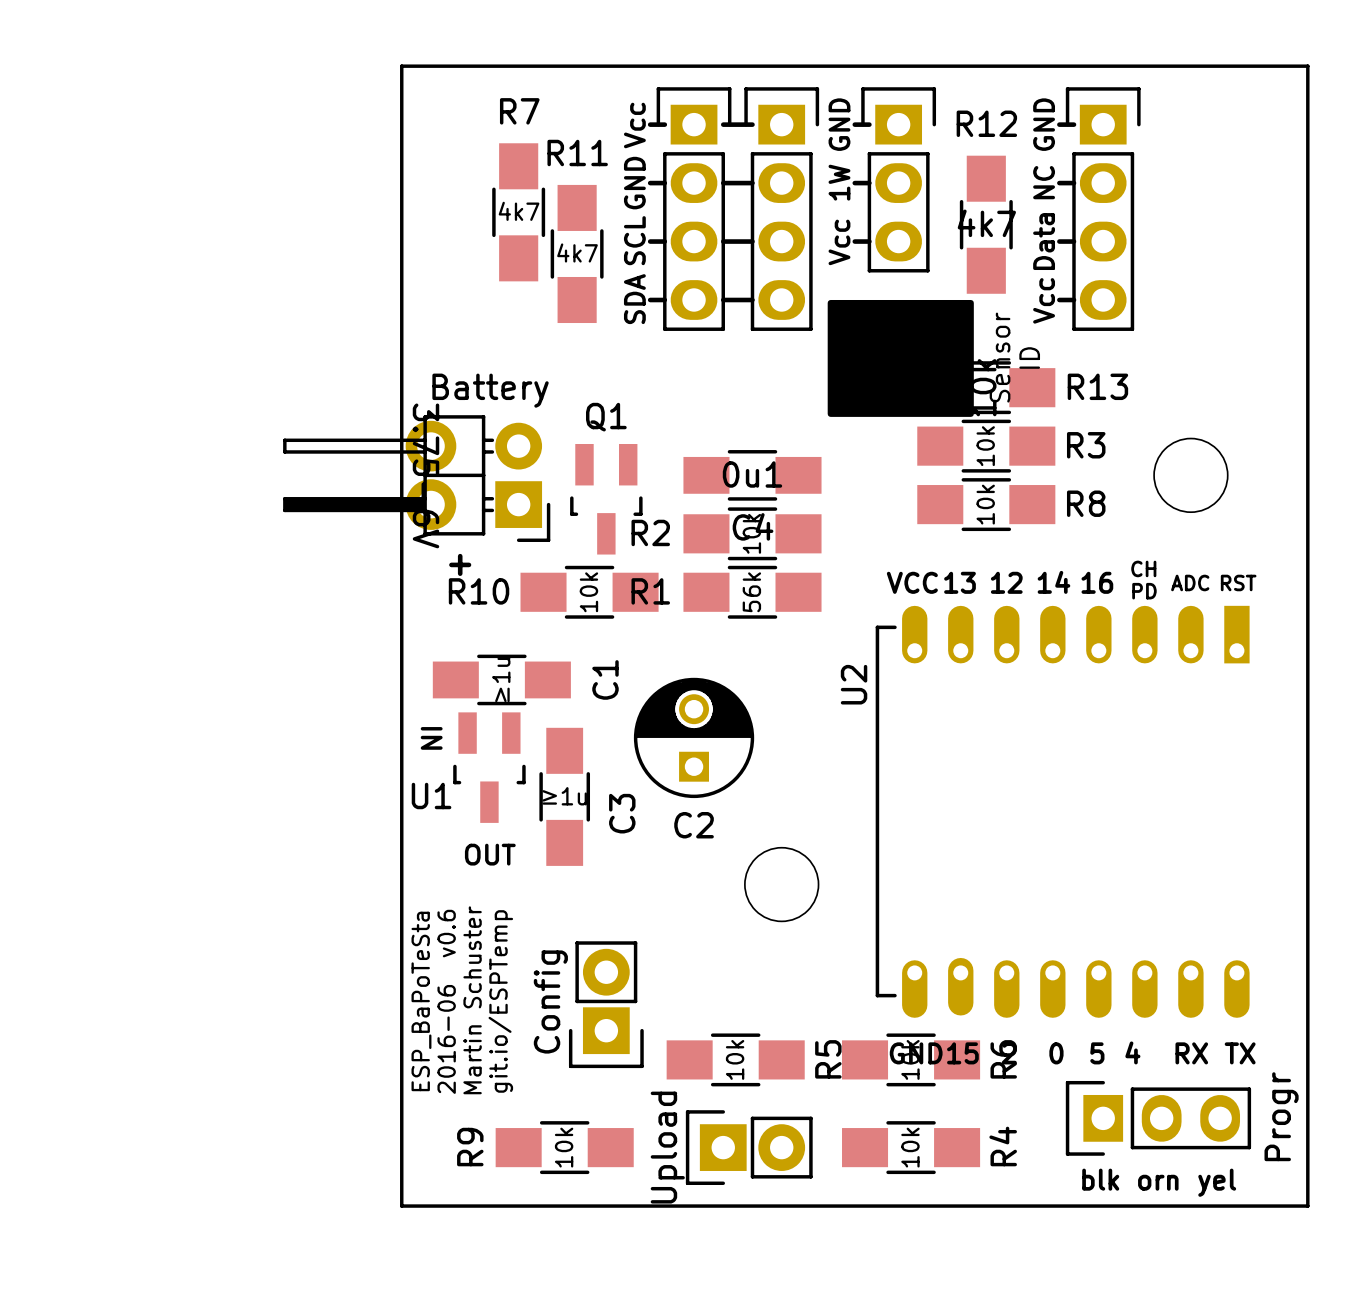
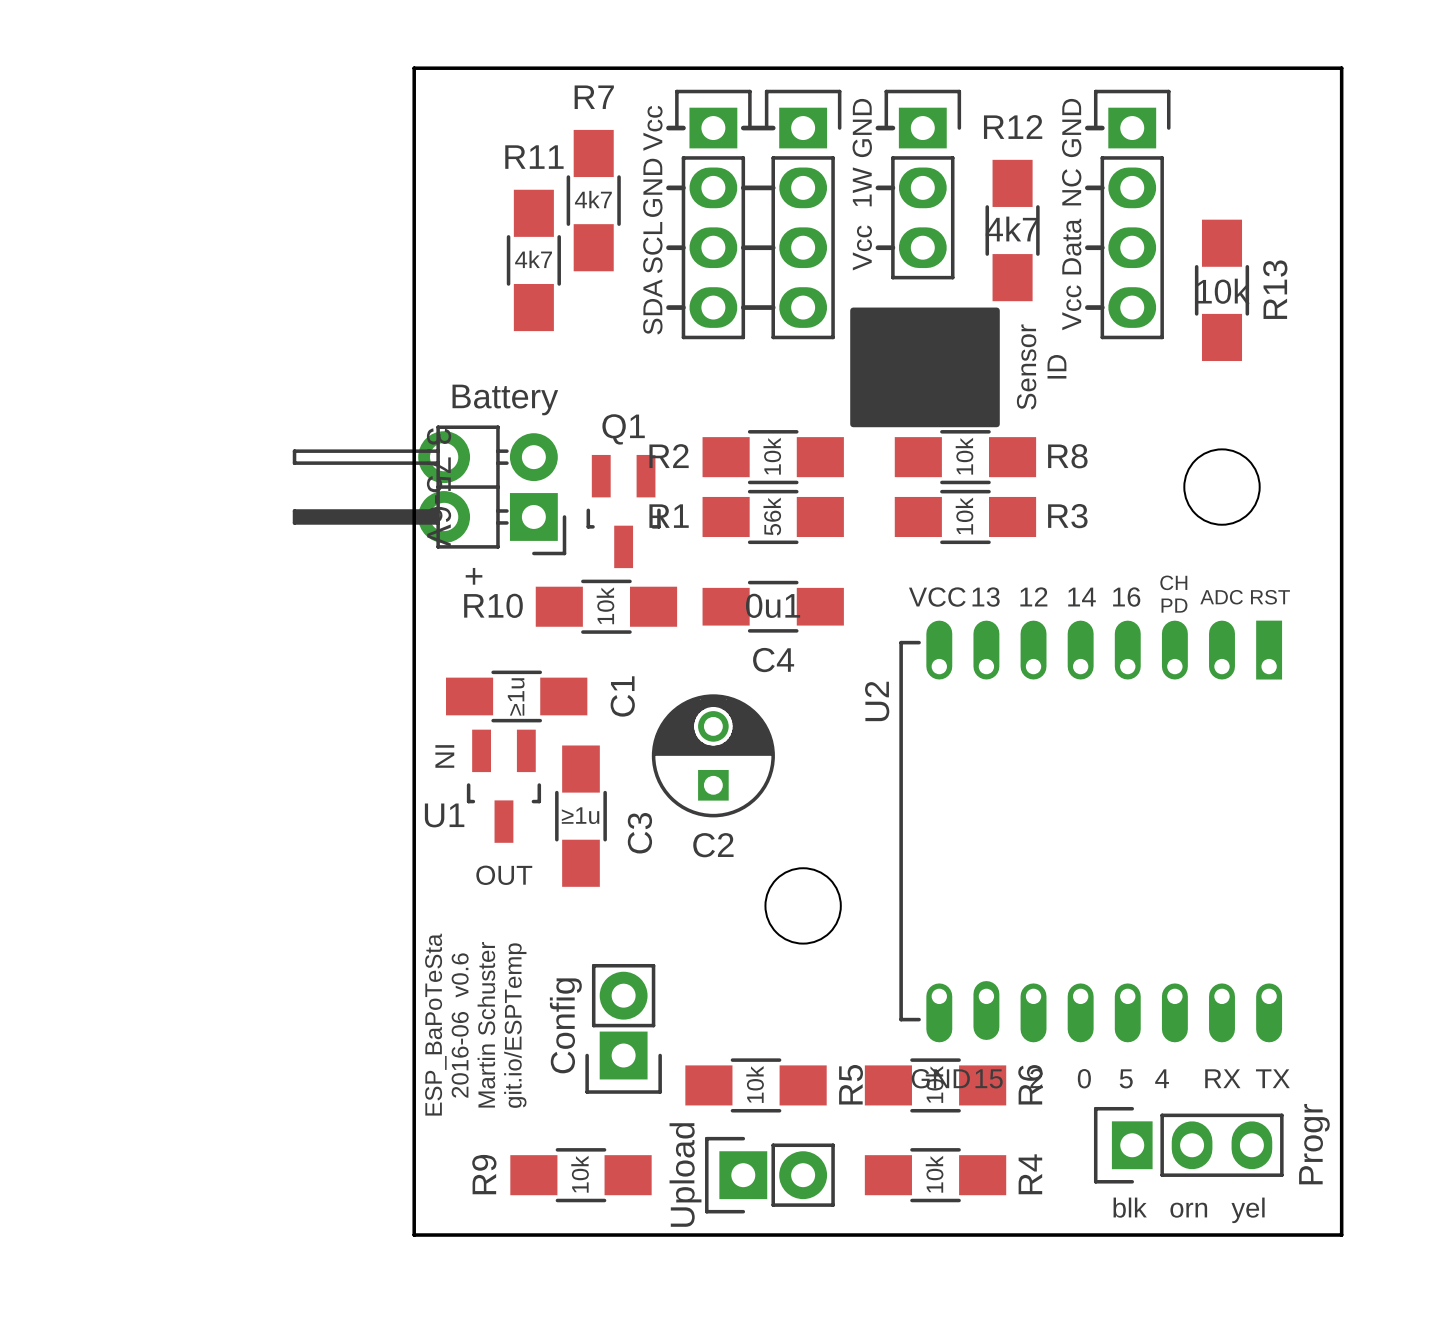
R7 position: (518, 212) -> (593, 200)
R11 position: (577, 253) -> (533, 260)
R13 name position: R13 (1097, 386) -> R13 (1275, 289)
R13 rotation: 0° (986, 387) -> 90° clockwise (1222, 290)
R13 position: (986, 387) -> (1222, 290)
R3 position: (986, 446) -> (965, 516)
C4 position: (752, 475) -> (773, 606)
R8 position: (986, 504) -> (965, 457)
R2 position: (752, 533) -> (773, 457)
R1 position: (752, 592) -> (773, 516)

